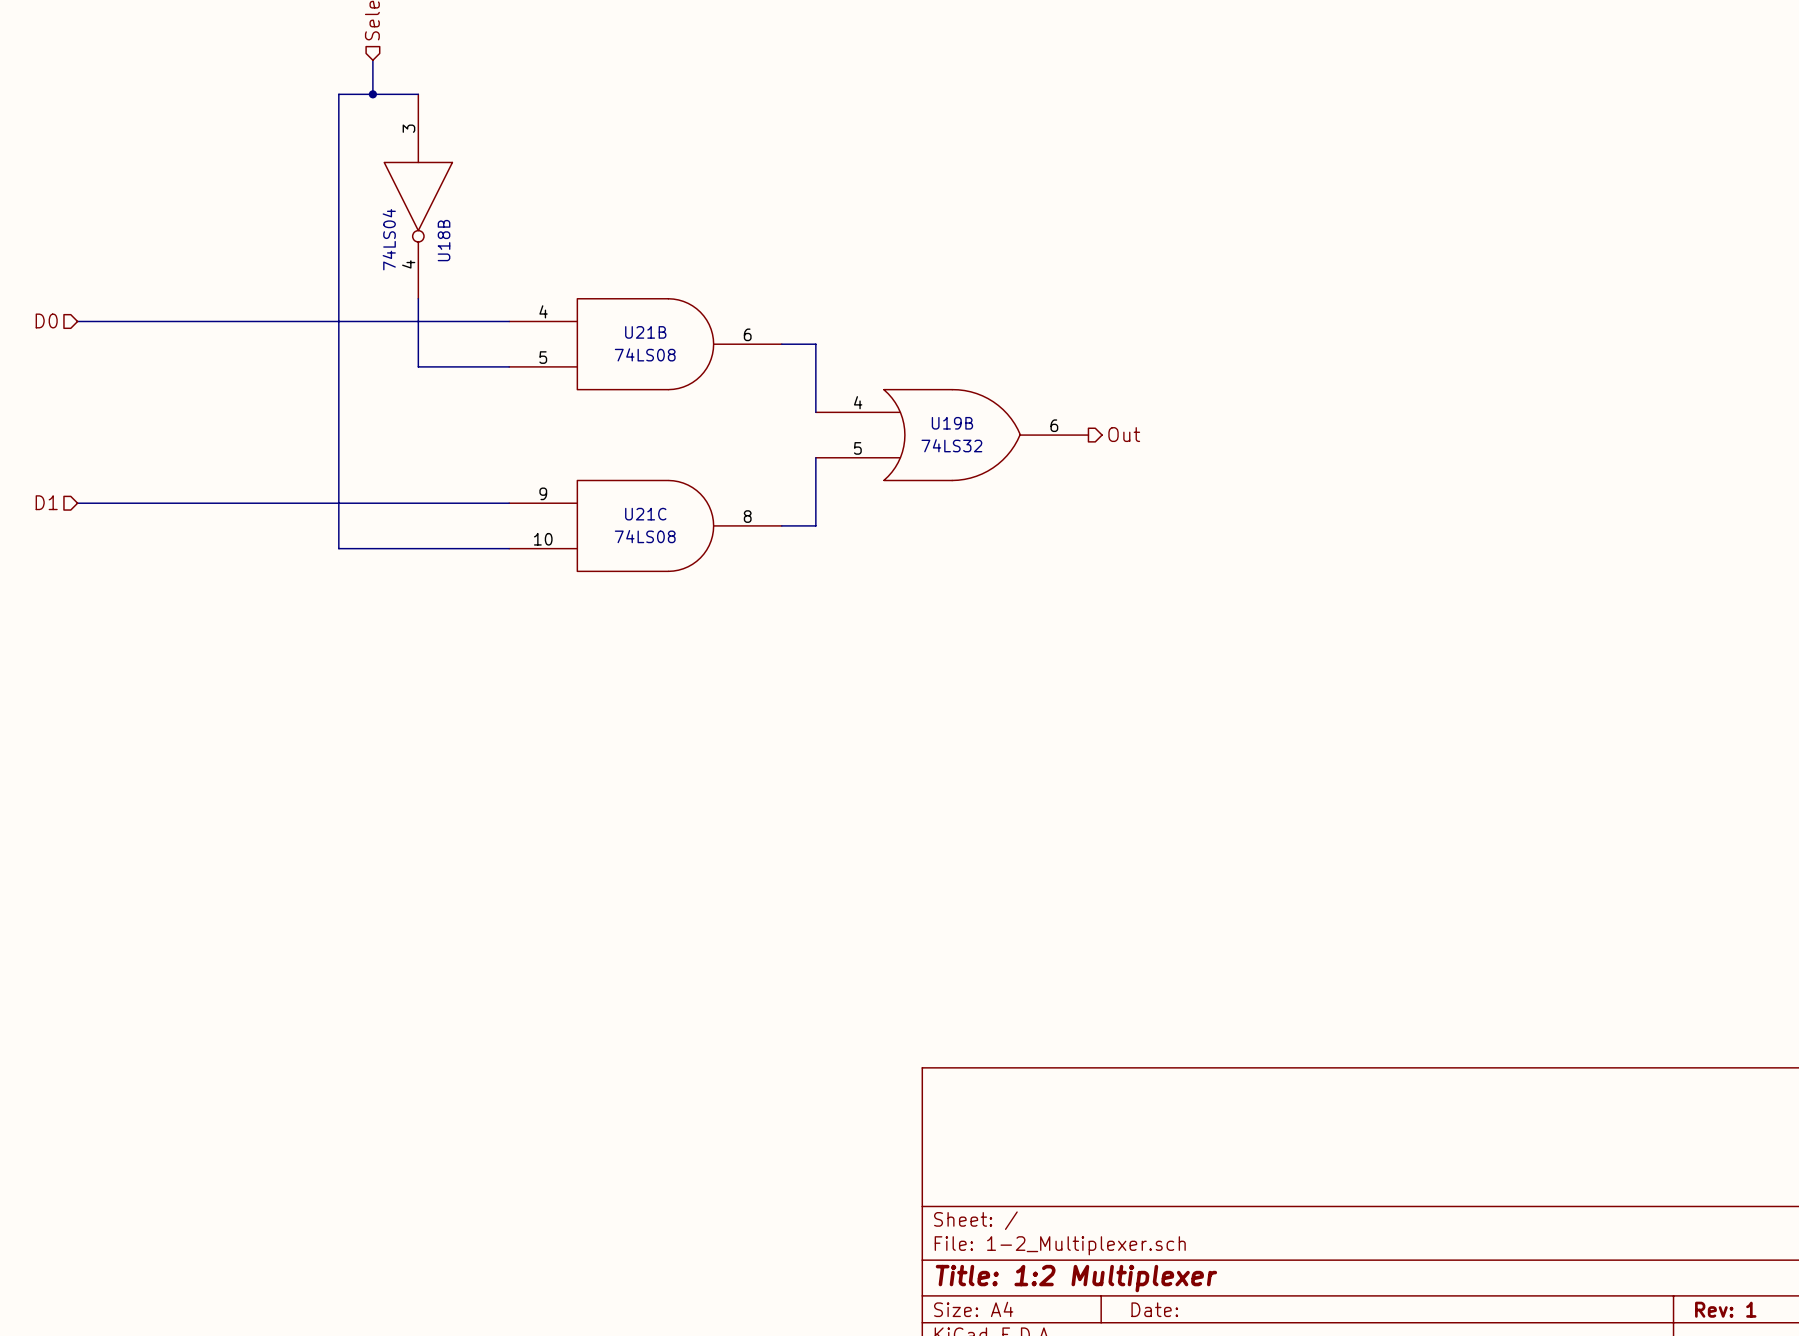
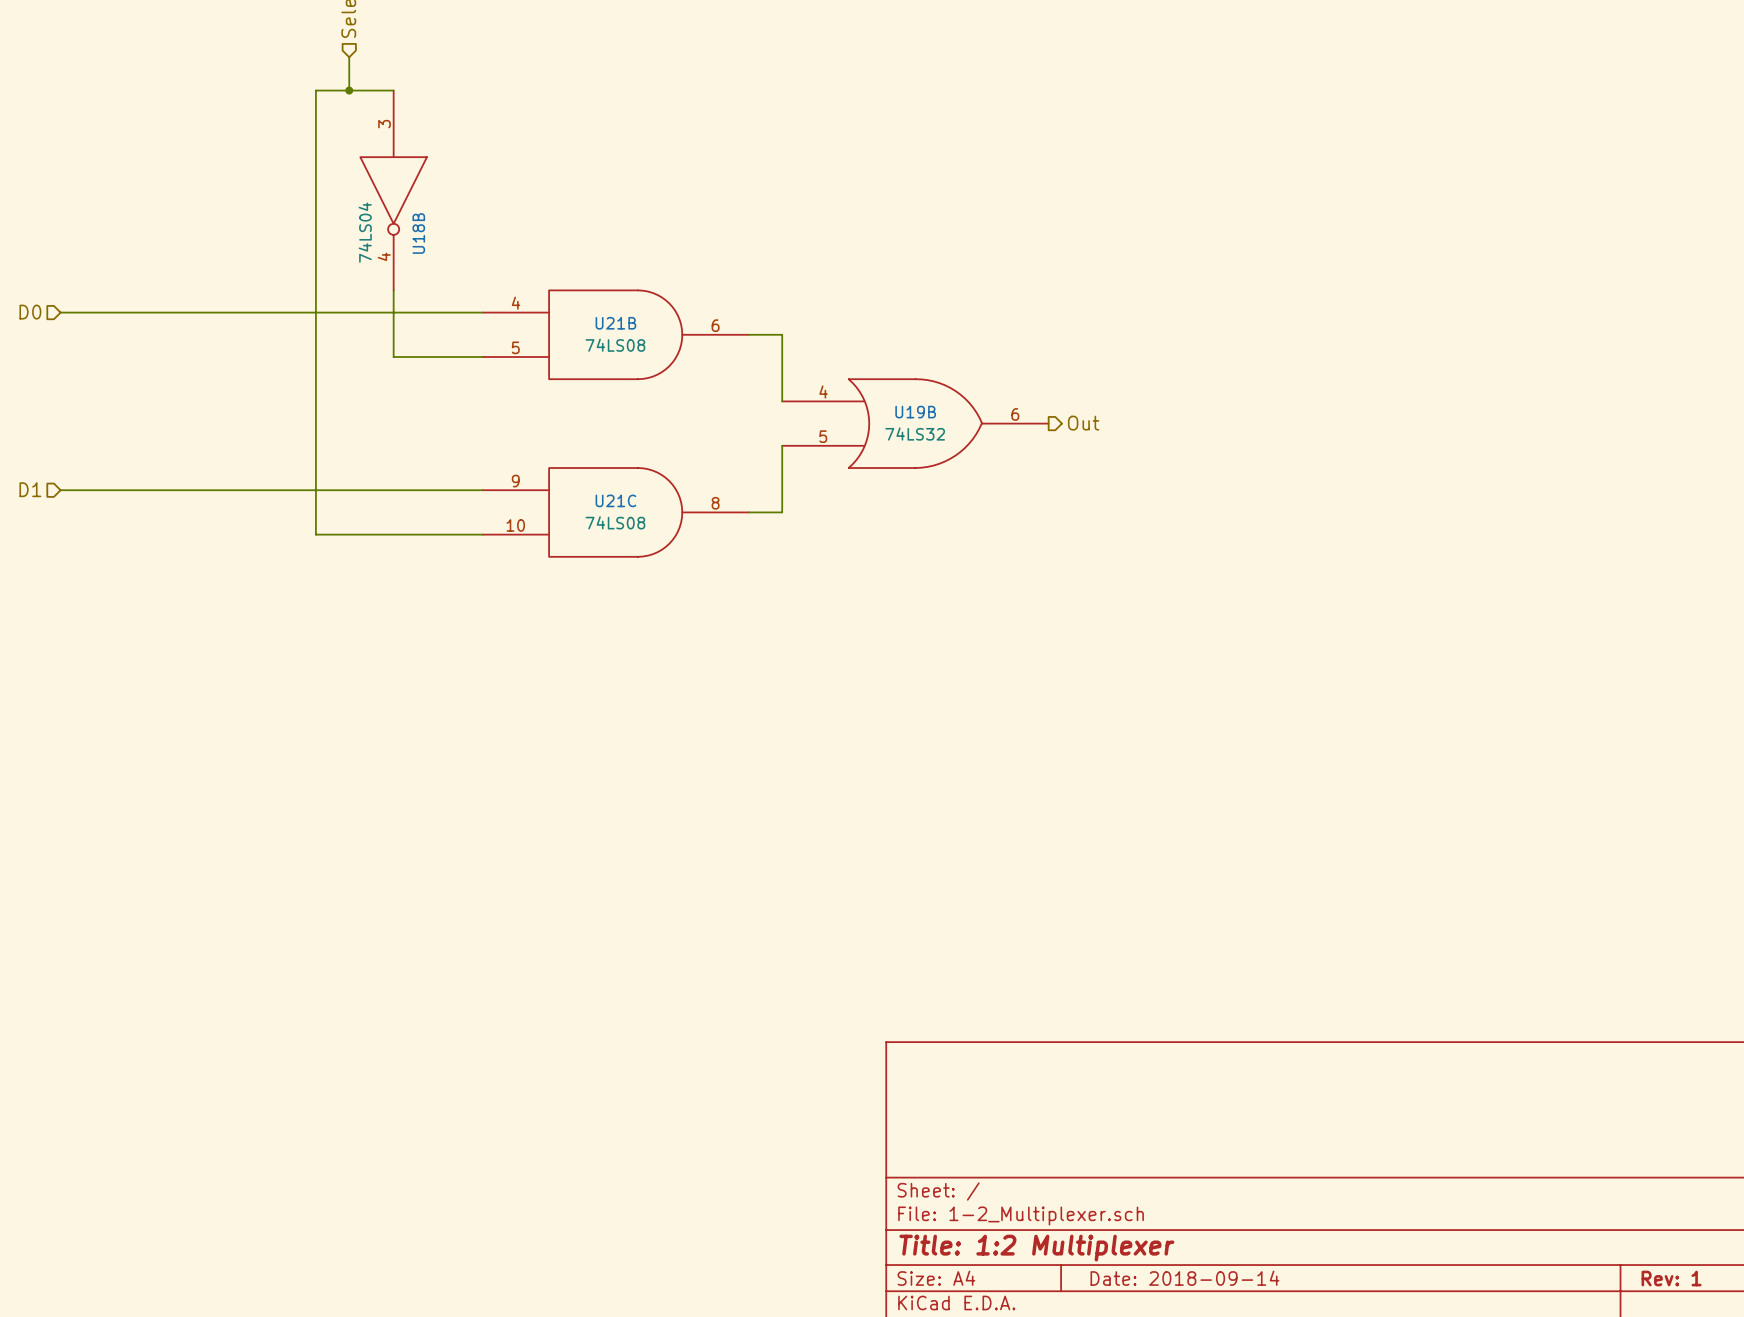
title block: Date: (1154, 1309) -> Date: 2018-09-14 (1184, 1278)

